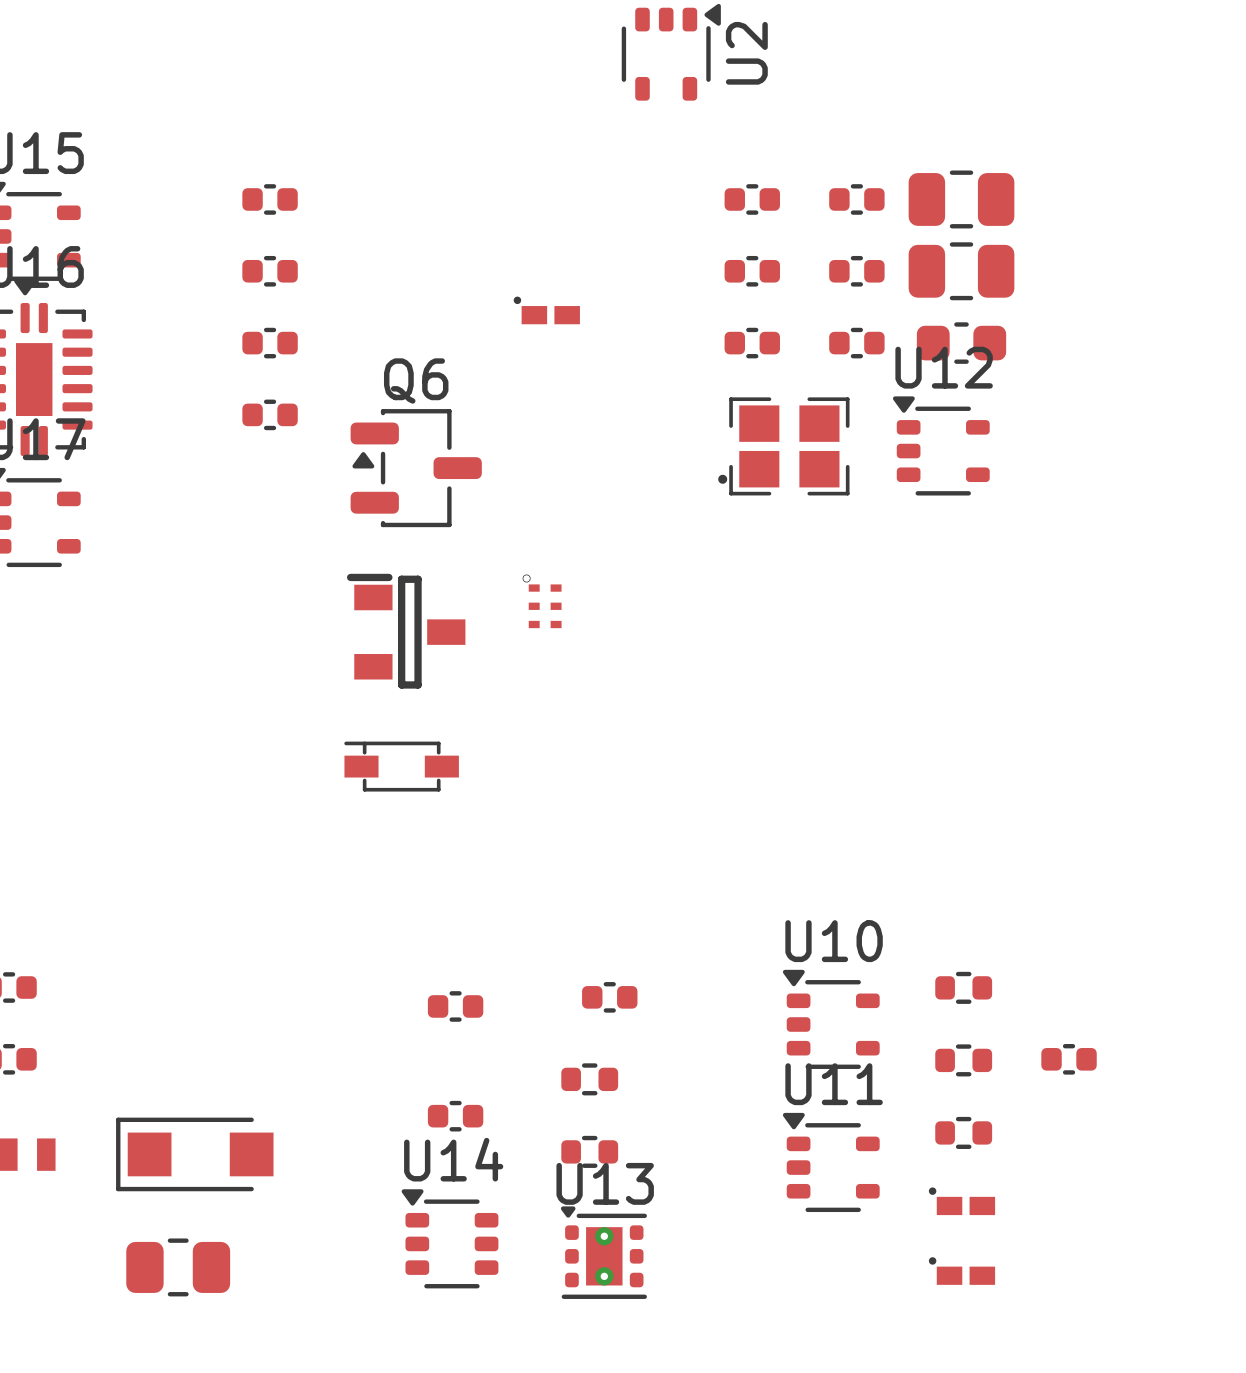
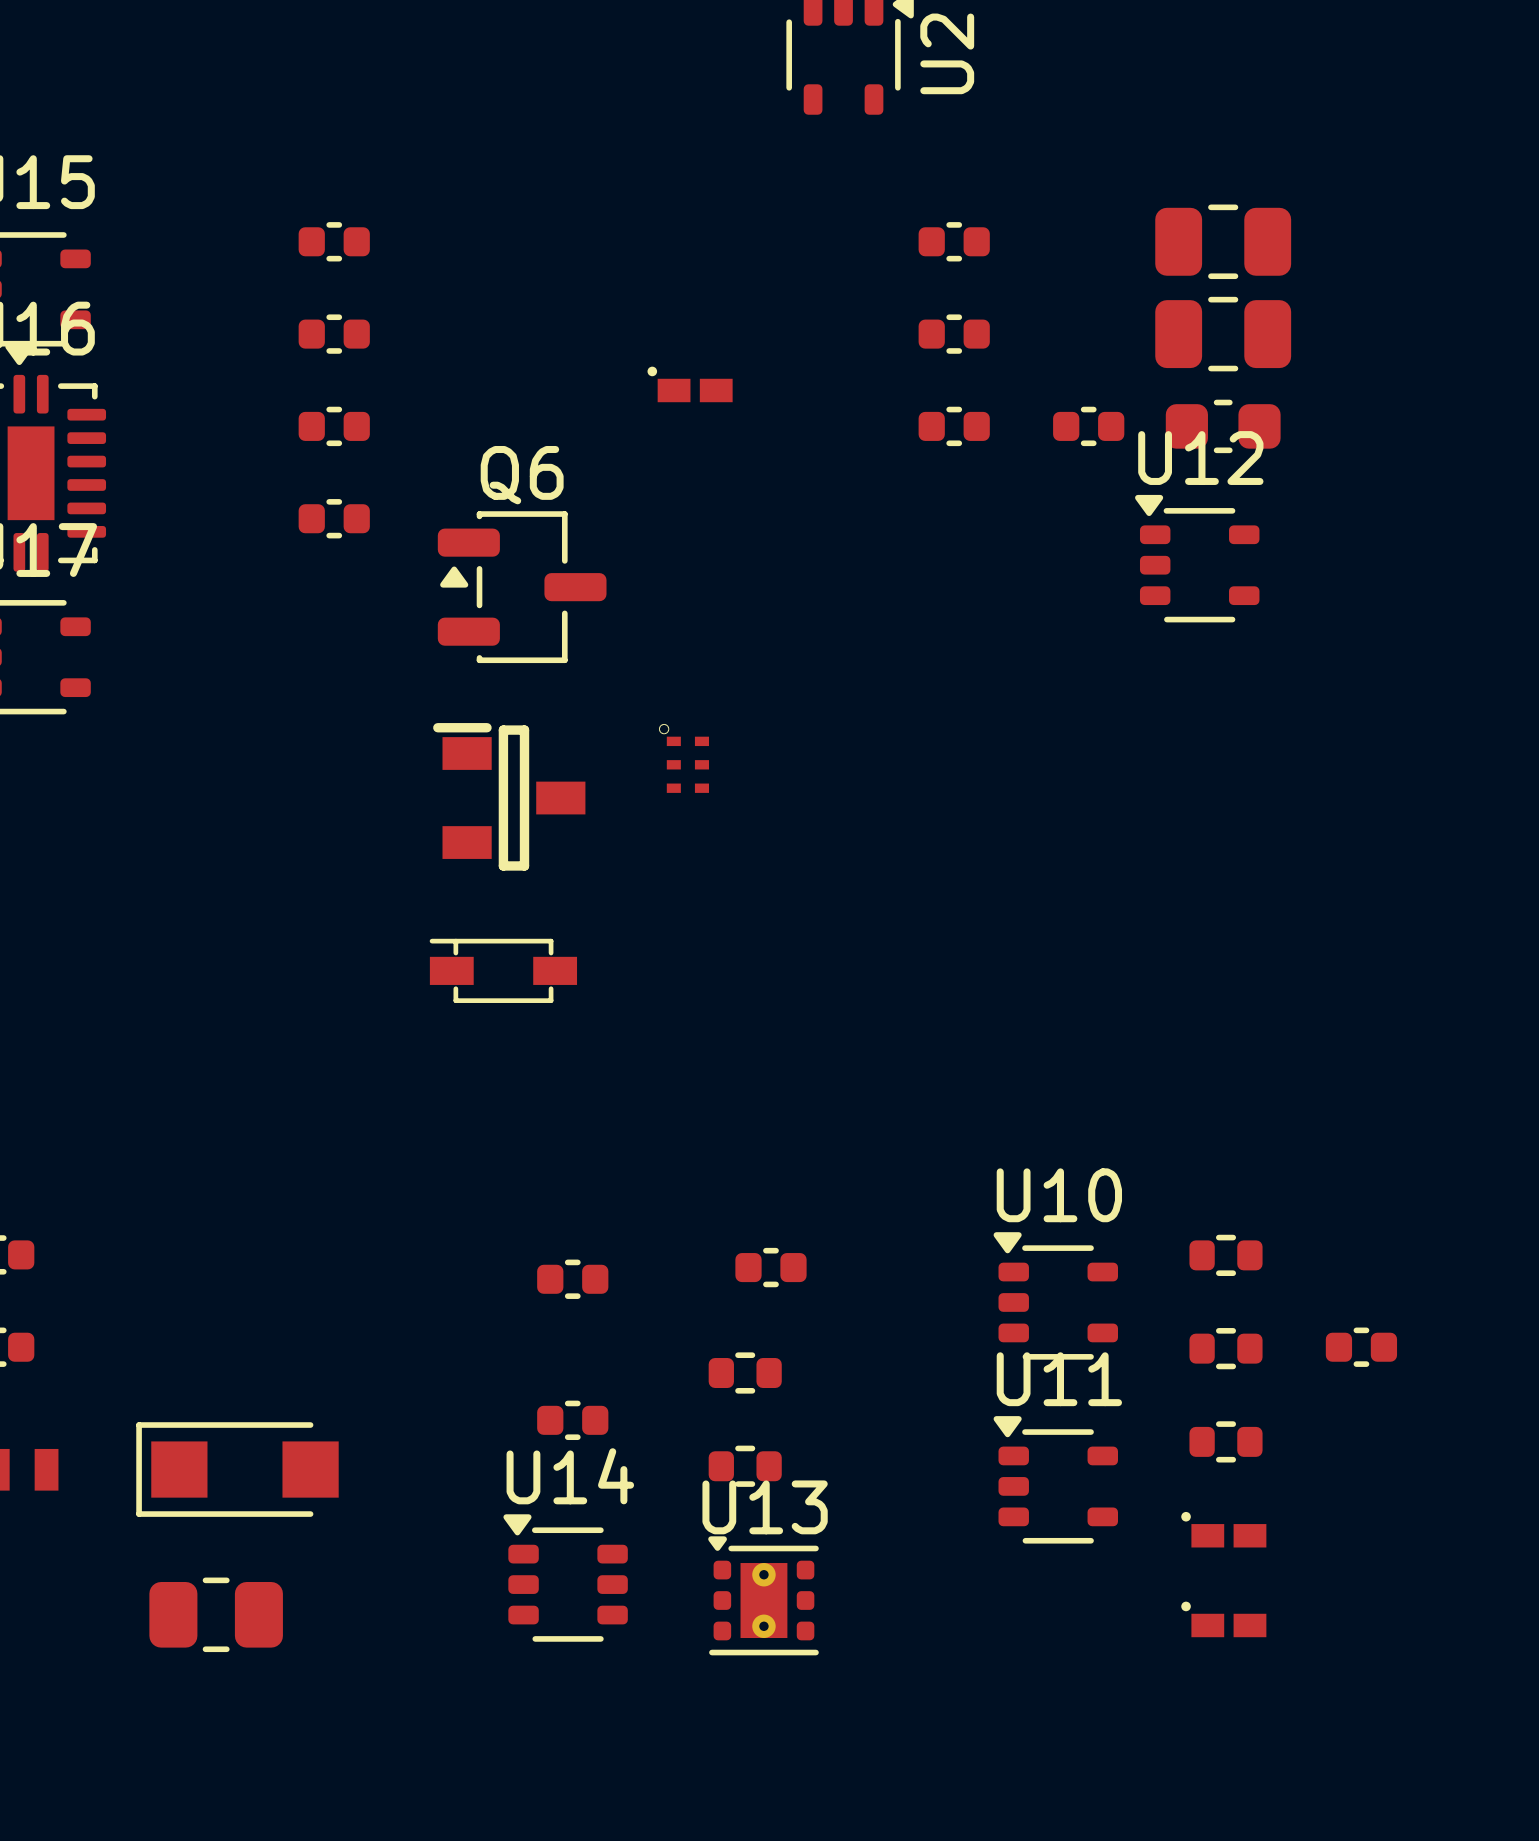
part: (856, 199) -> none
part: (856, 271) -> none
part: (783, 446) -> none

